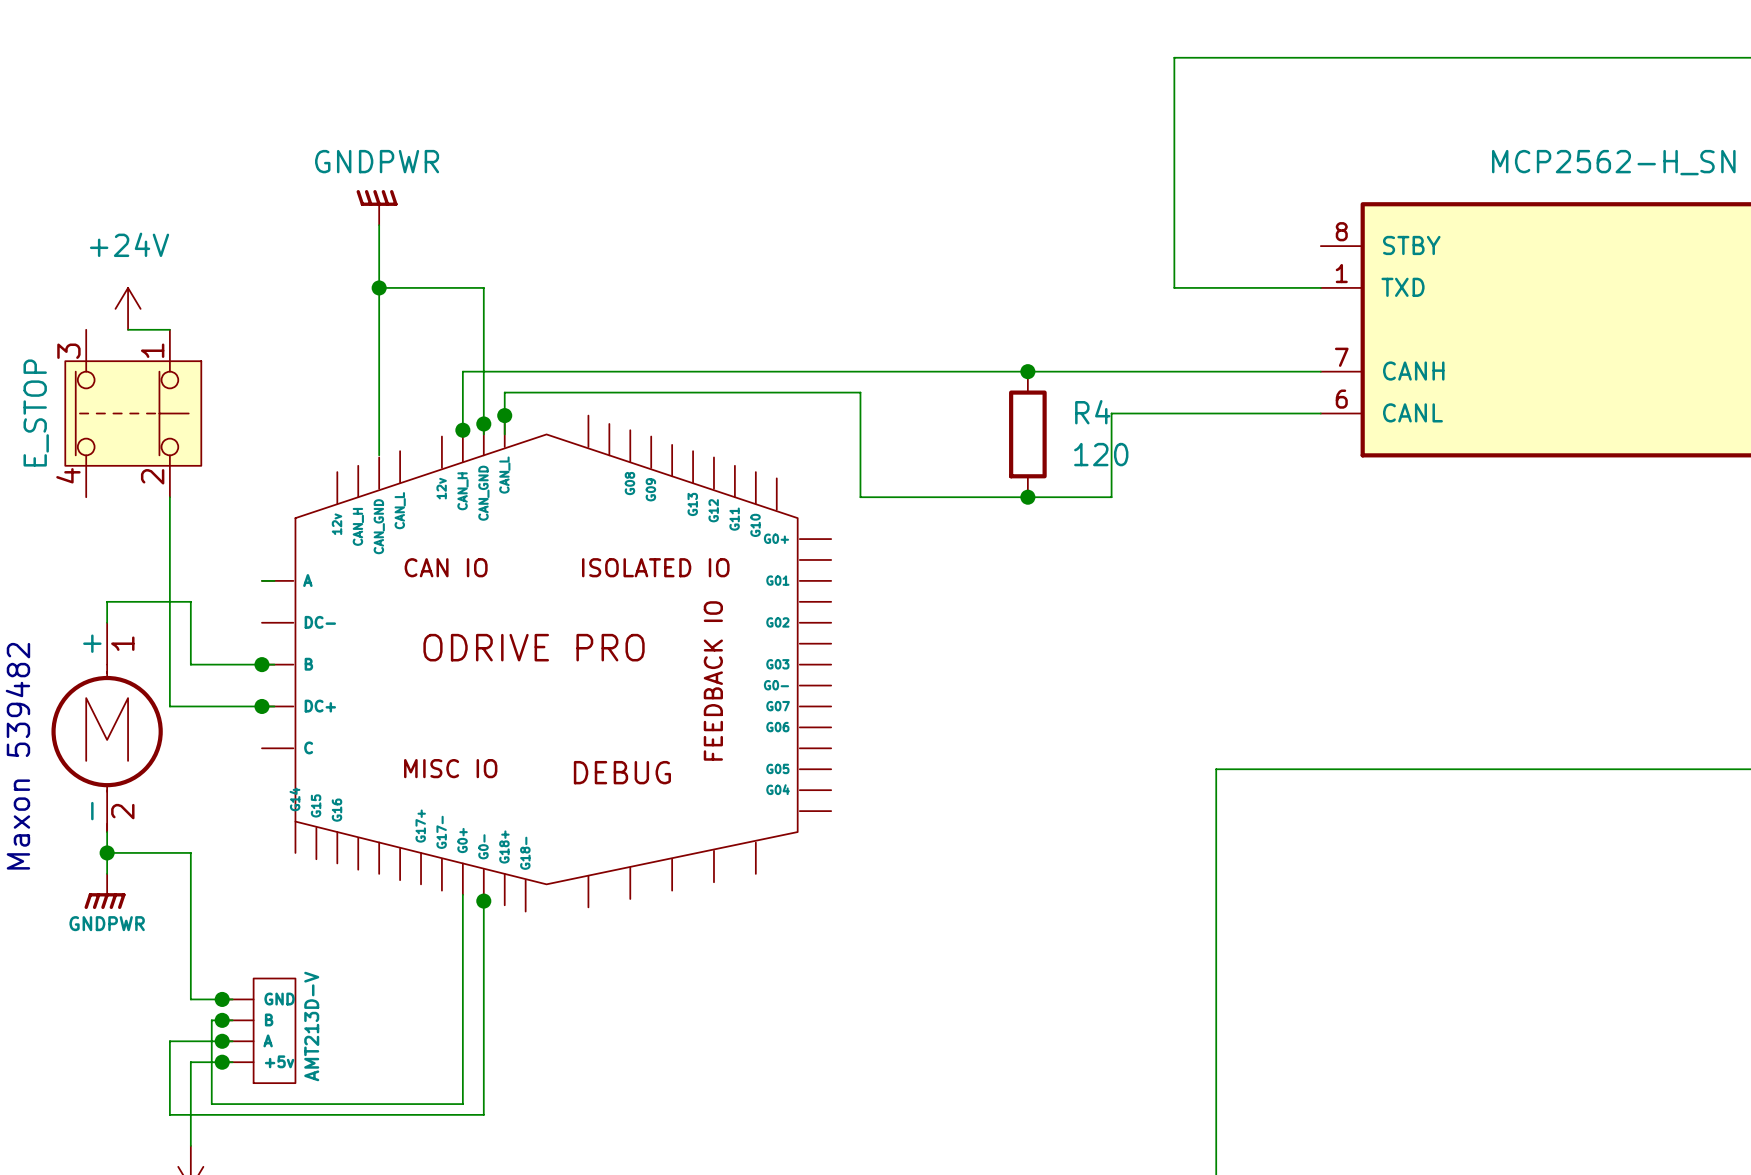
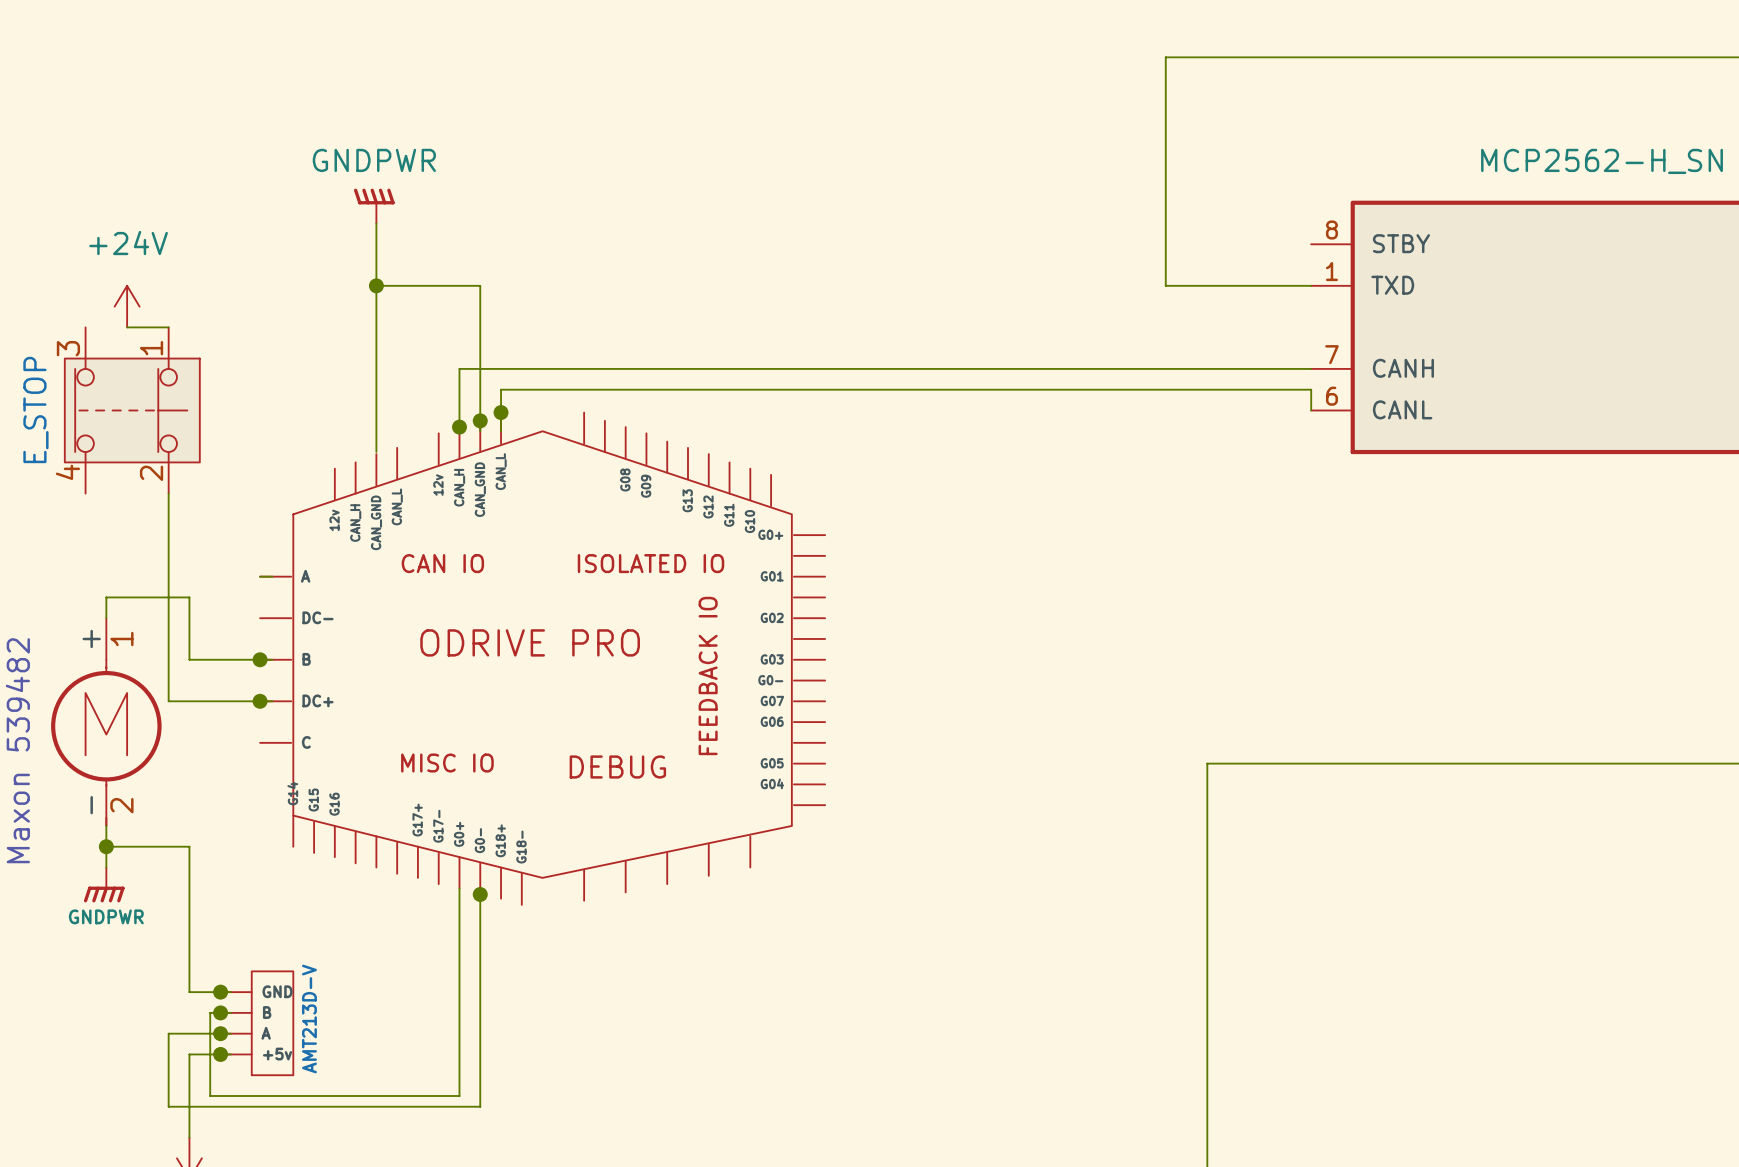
junction: (1027, 371) -> none
wire: (860, 392) (860, 497) (1111, 497) (1111, 413) (1320, 413) -> (854, 389) (1311, 389) (1311, 410)
R4: 120 (1027, 434) -> none
junction: (1027, 497) -> none

